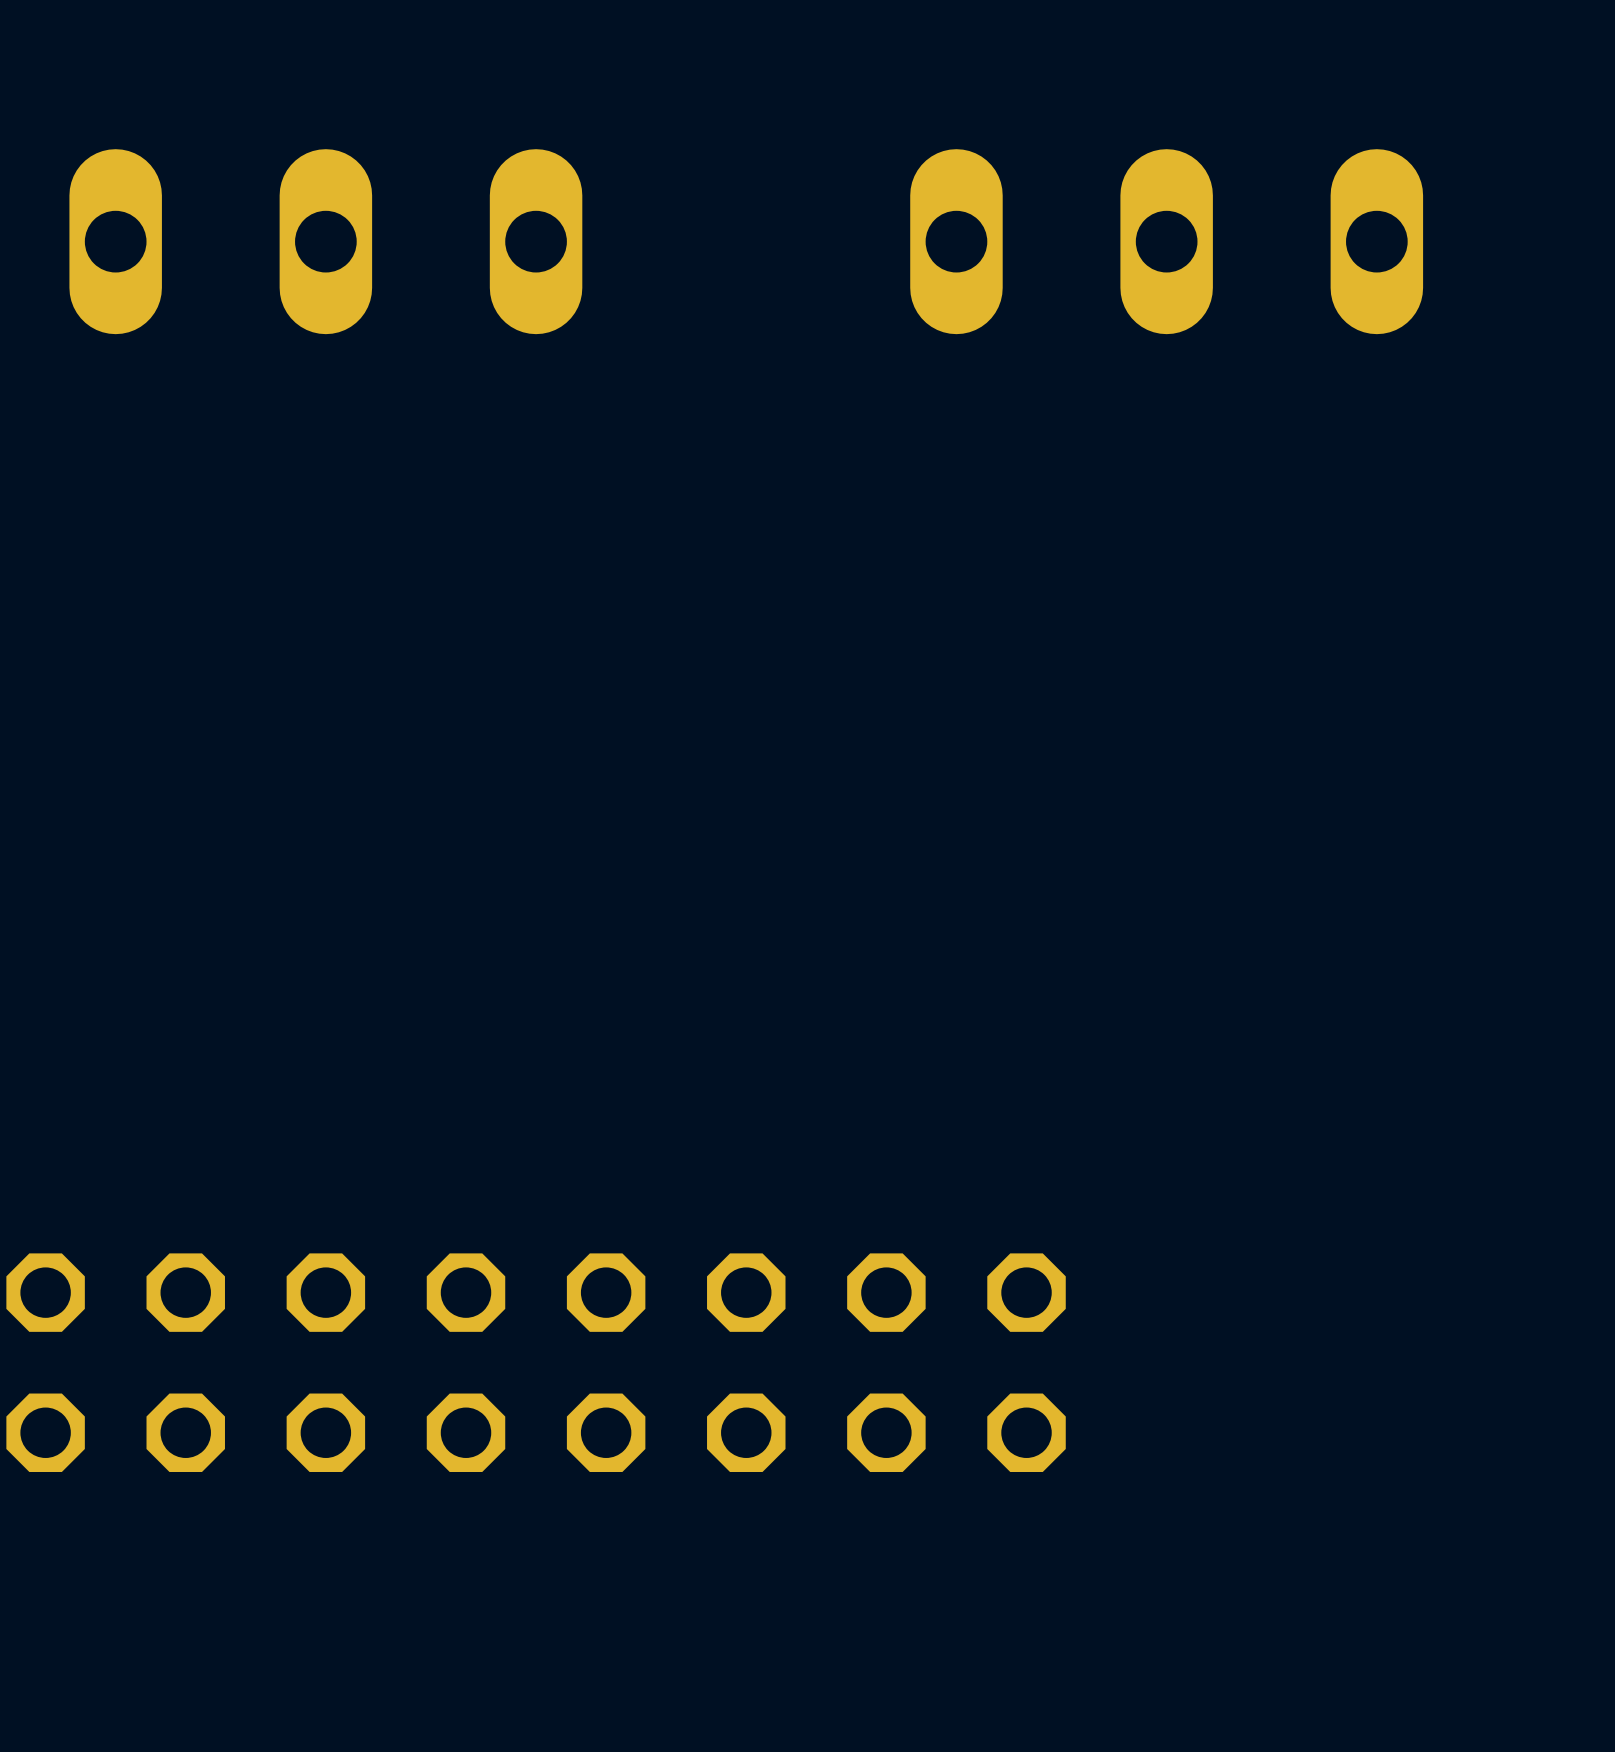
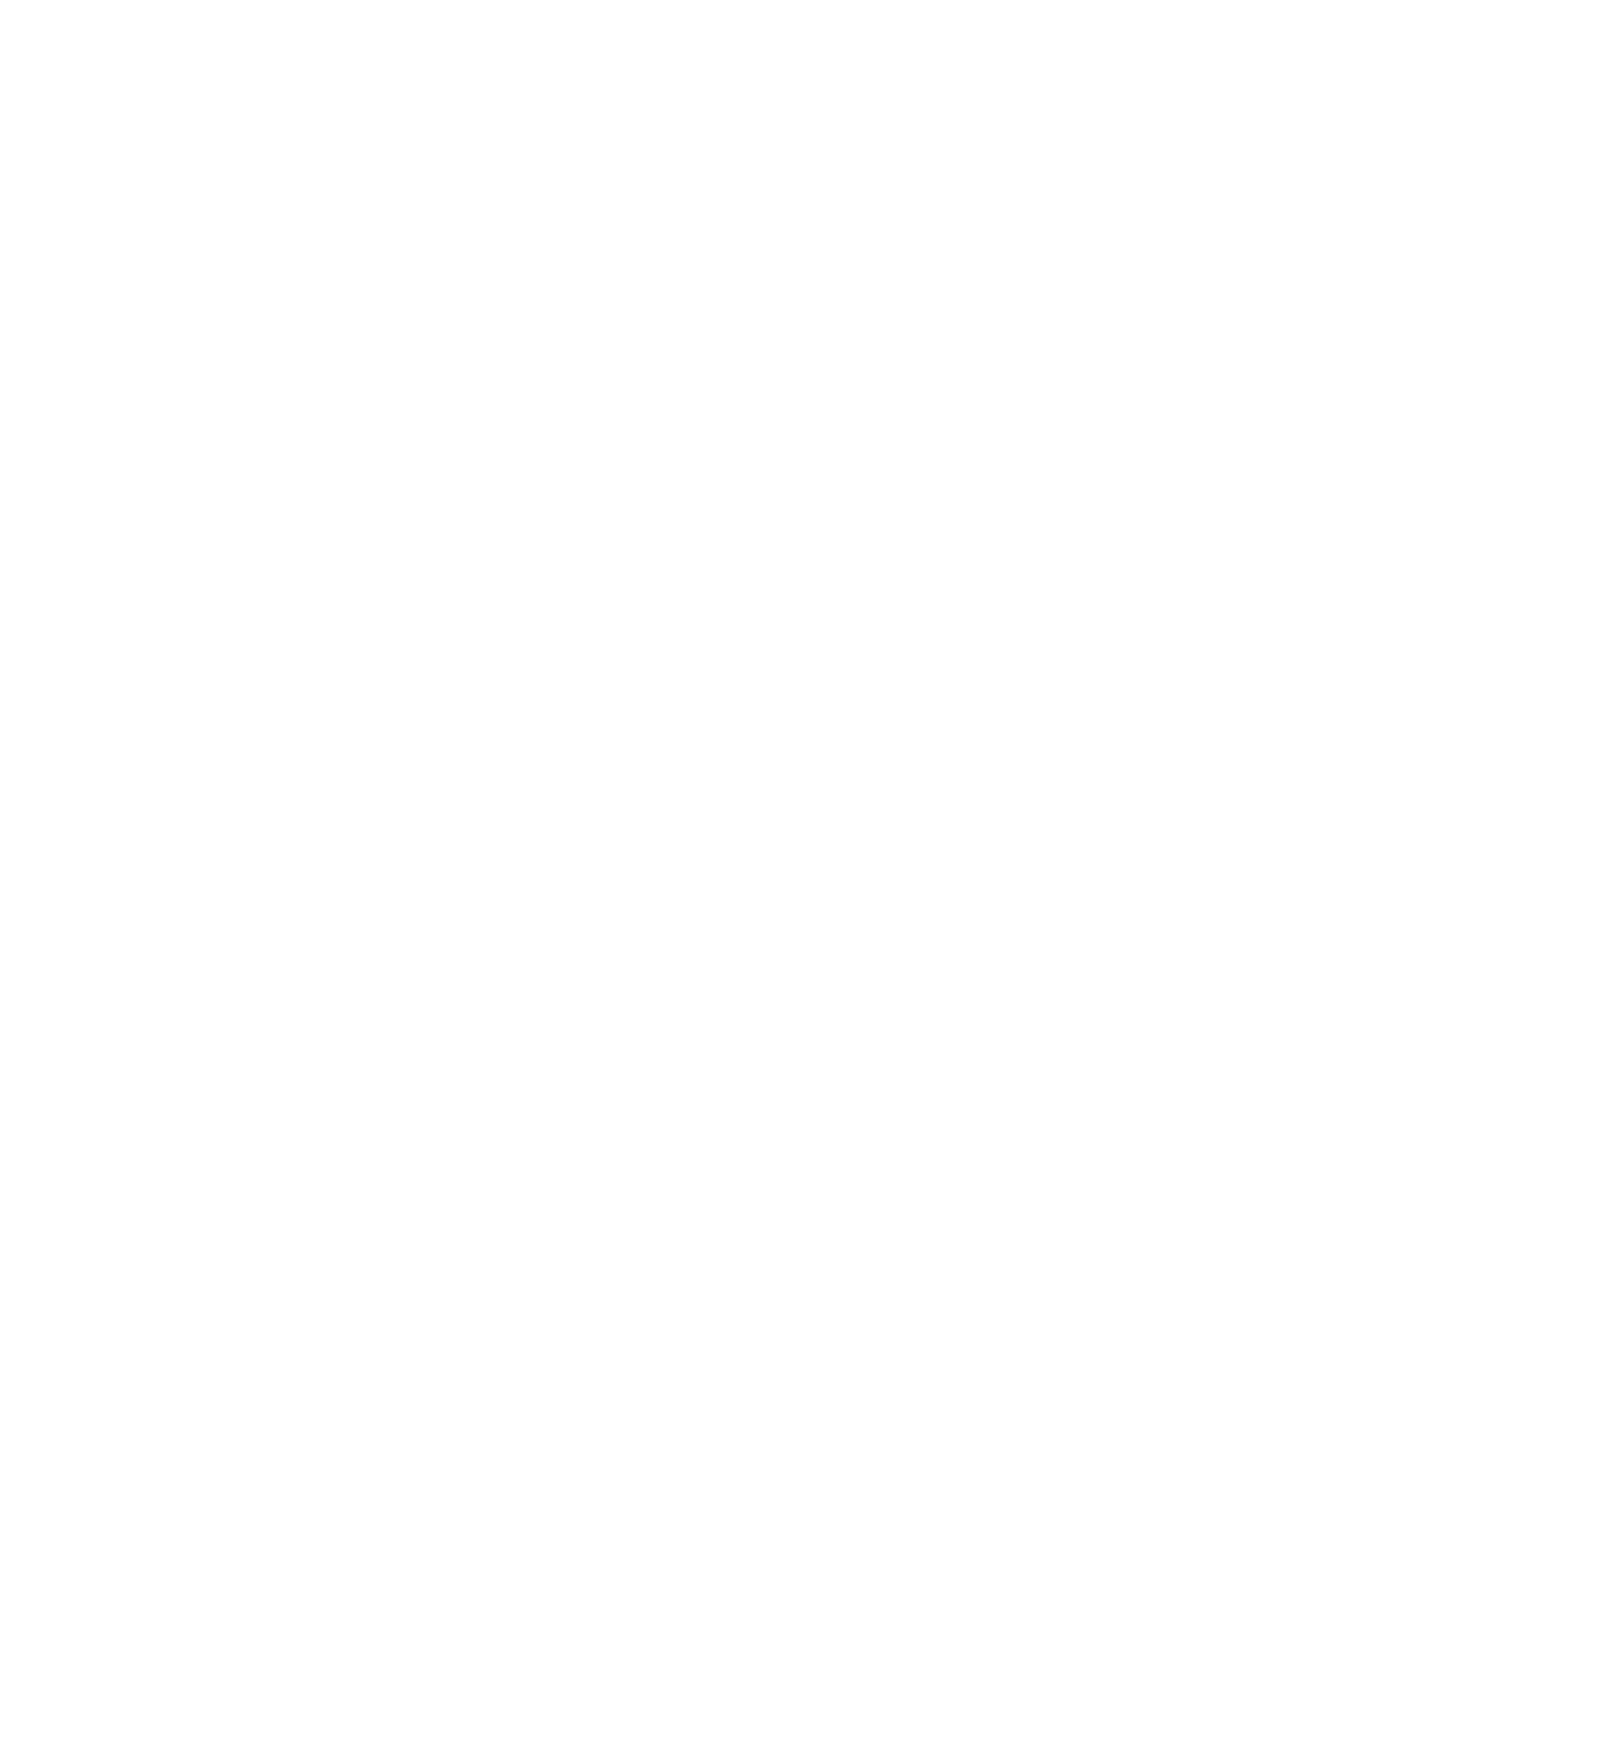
part: (325, 241) -> none
part: (1166, 241) -> none
part: (536, 1362) -> none

